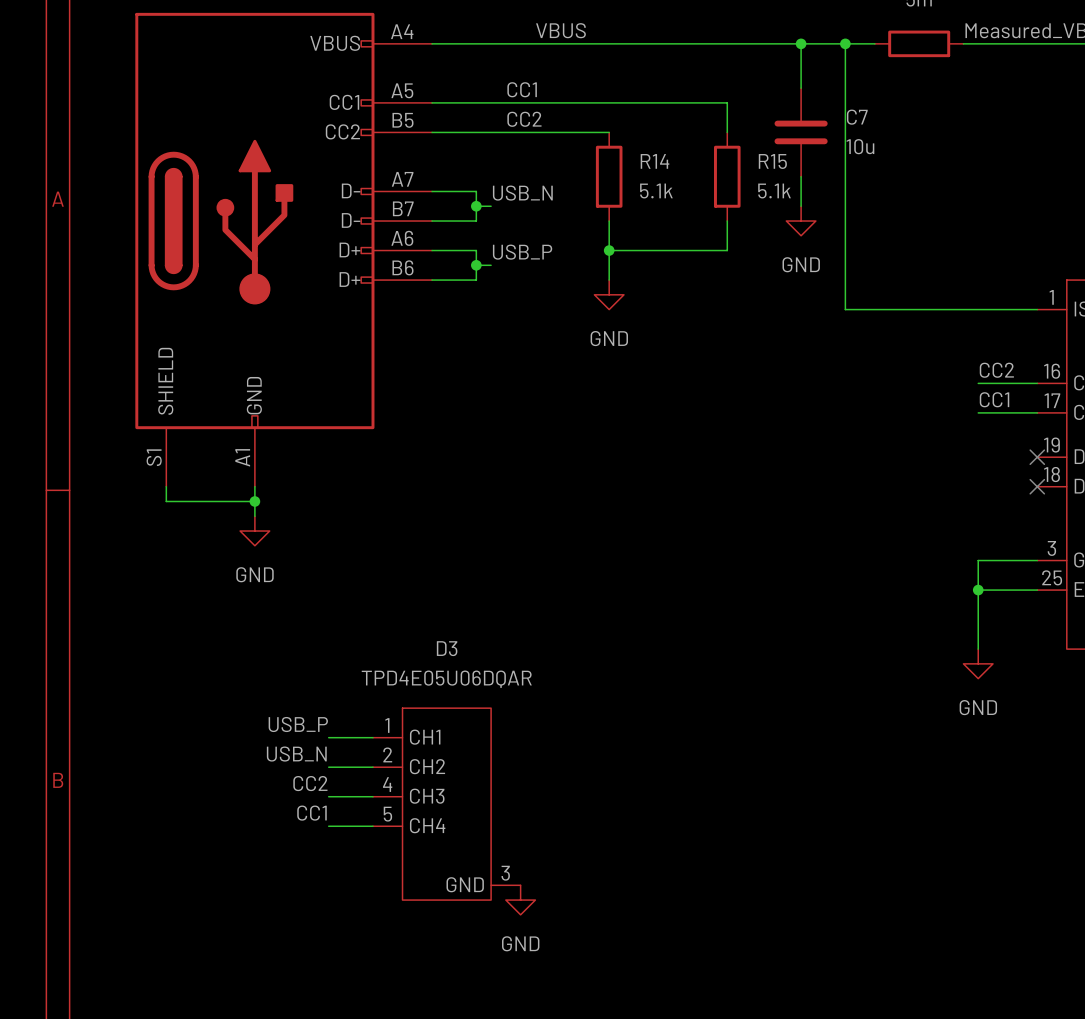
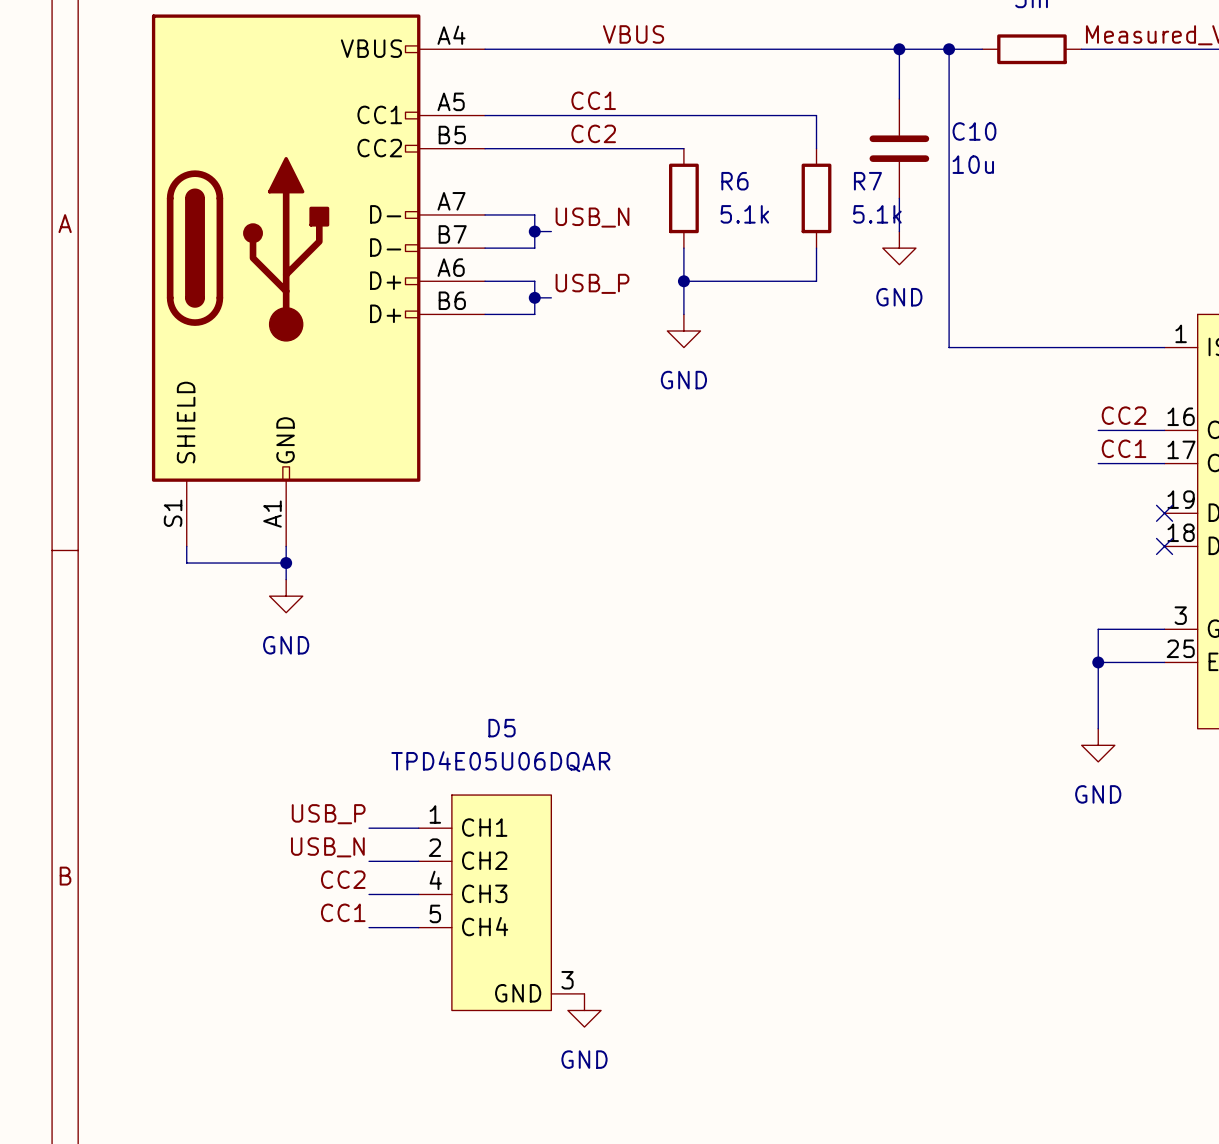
C7 name: C7 (857, 117) -> C10 (974, 131)
R14 name: R14 (655, 161) -> R6 (734, 181)
R15 name: R15 (772, 161) -> R7 (867, 181)
D3 name: D3 (447, 648) -> D5 (502, 728)

